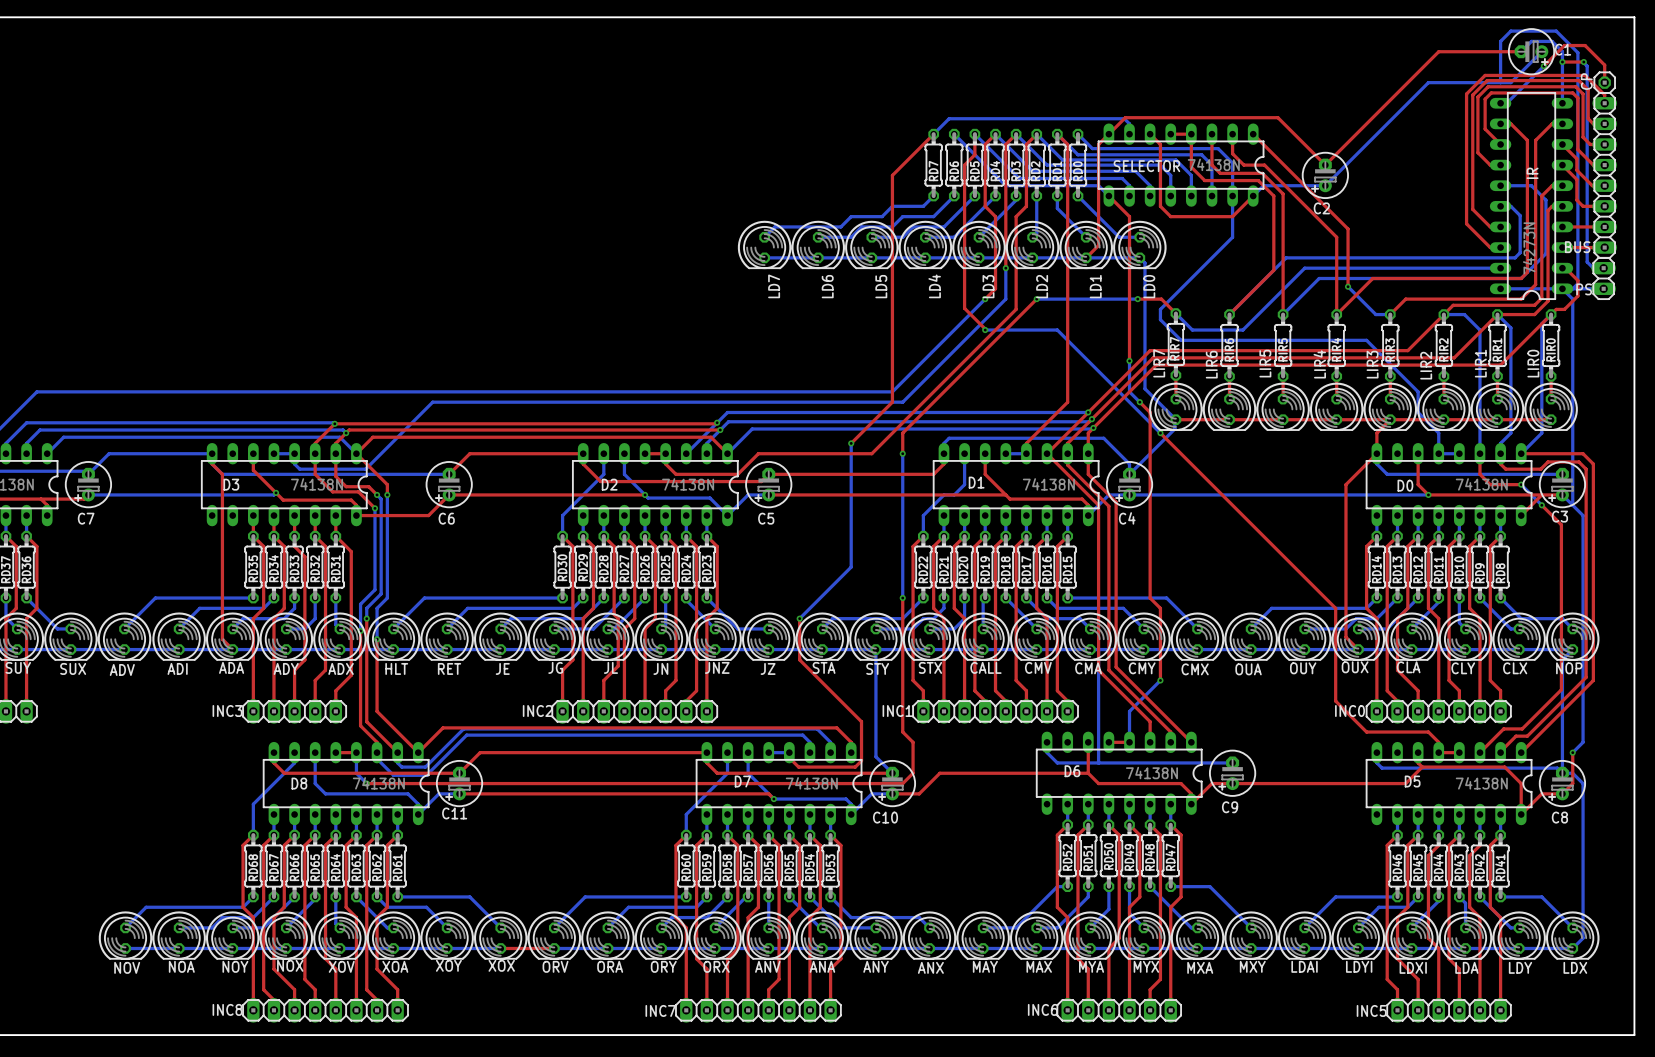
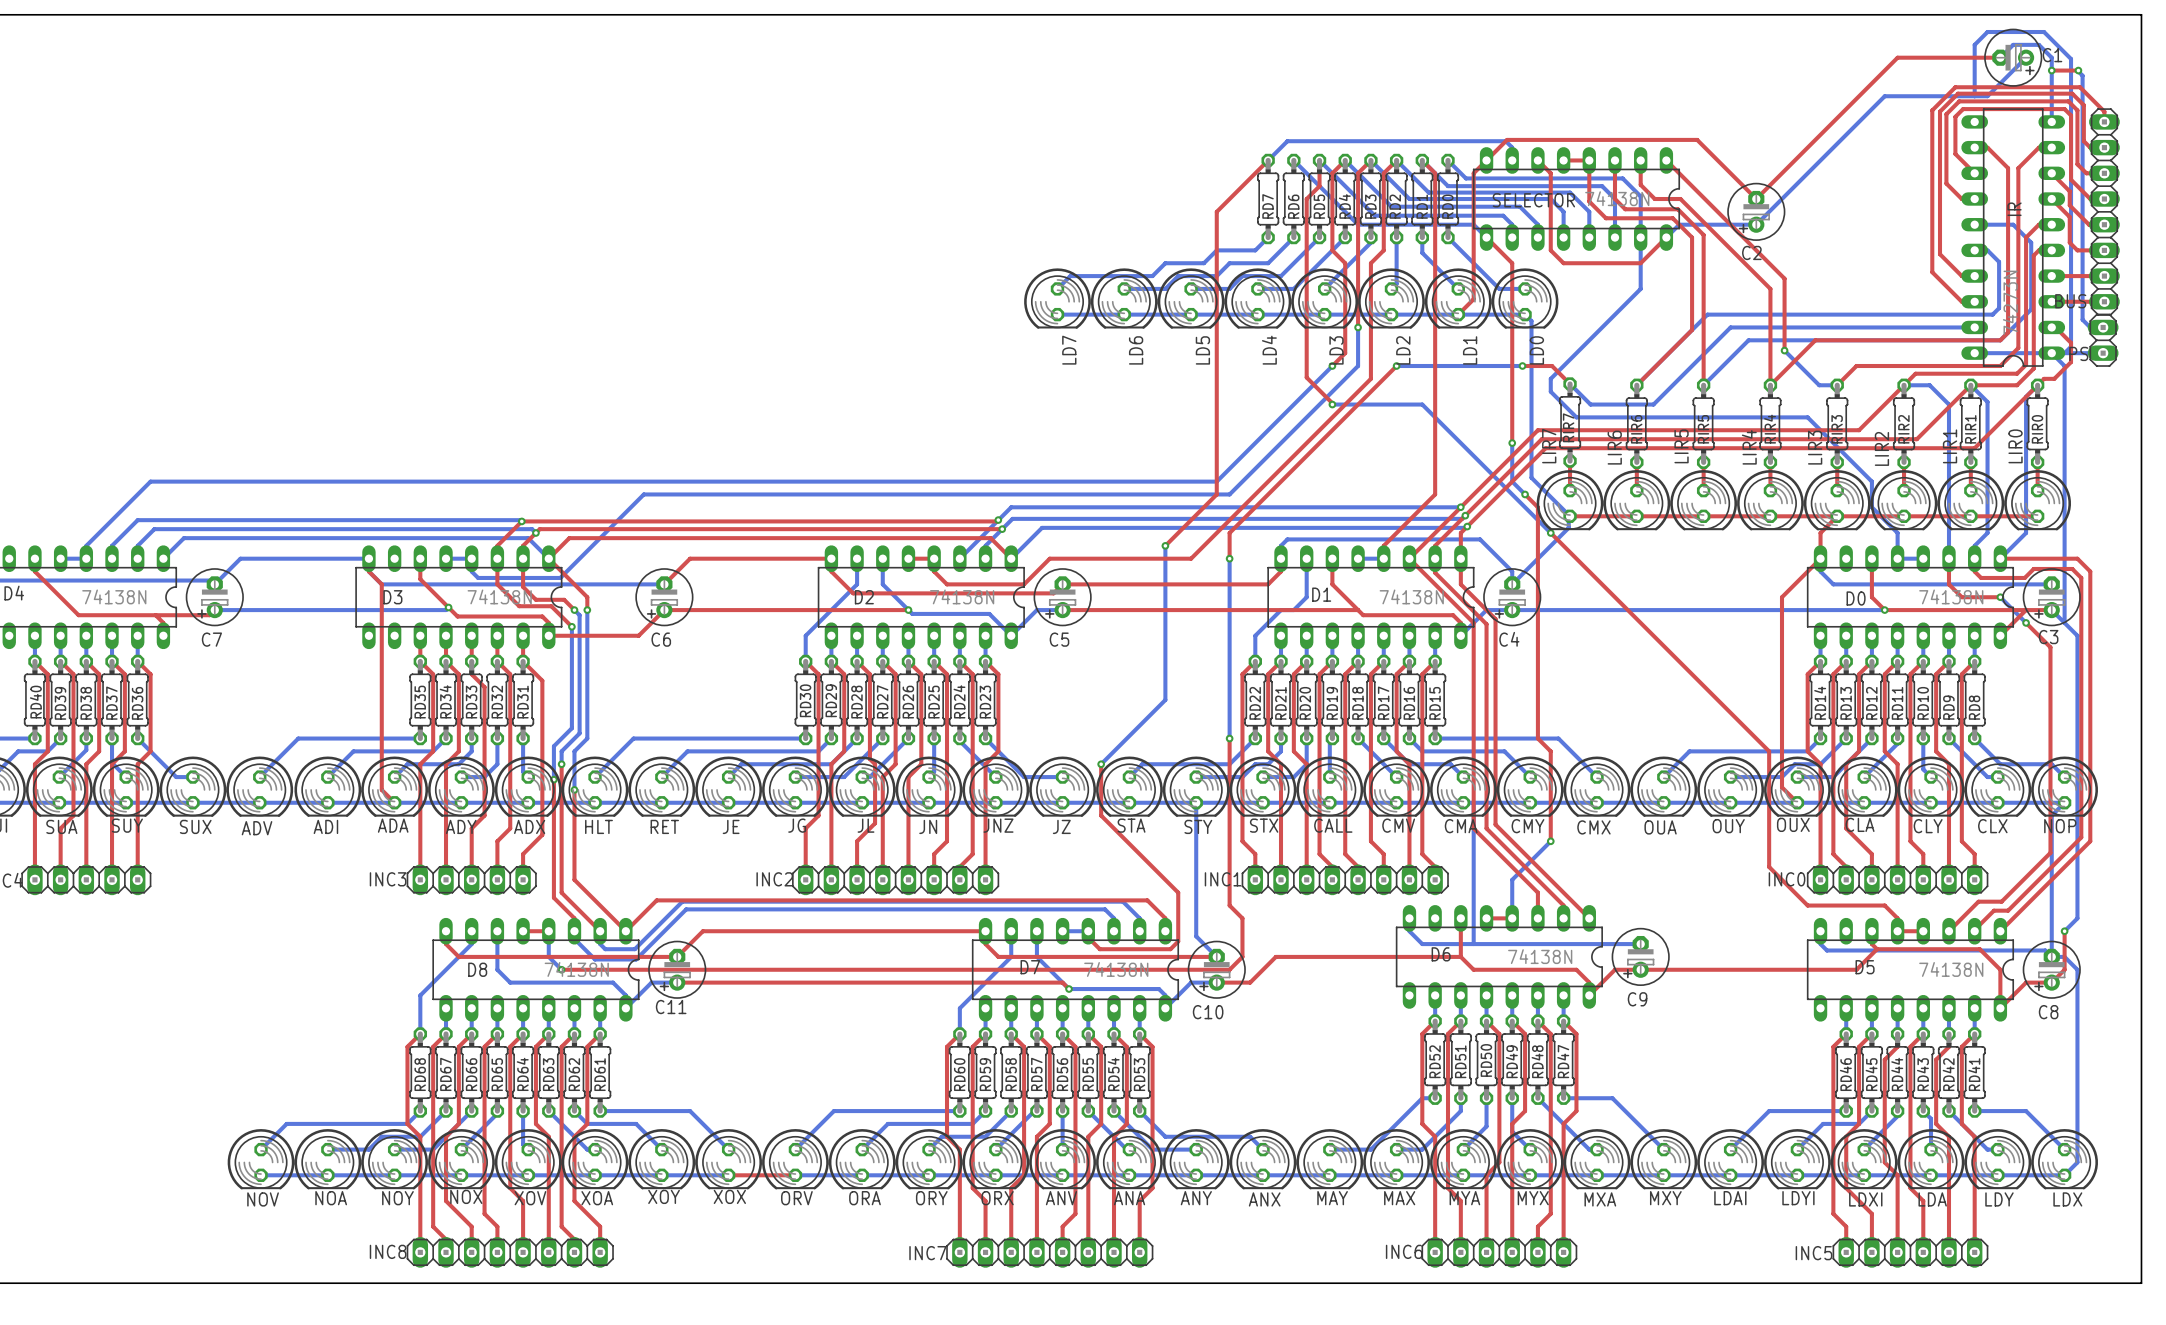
top track: (1543, 66) (1564, 45) (1585, 45) (1604, 65) (1604, 82) -> none
bottom track: (1543, 66) (1506, 103) (1500, 103) -> none
via: (1543, 66) -> none
CP: (1604, 82) -> none

